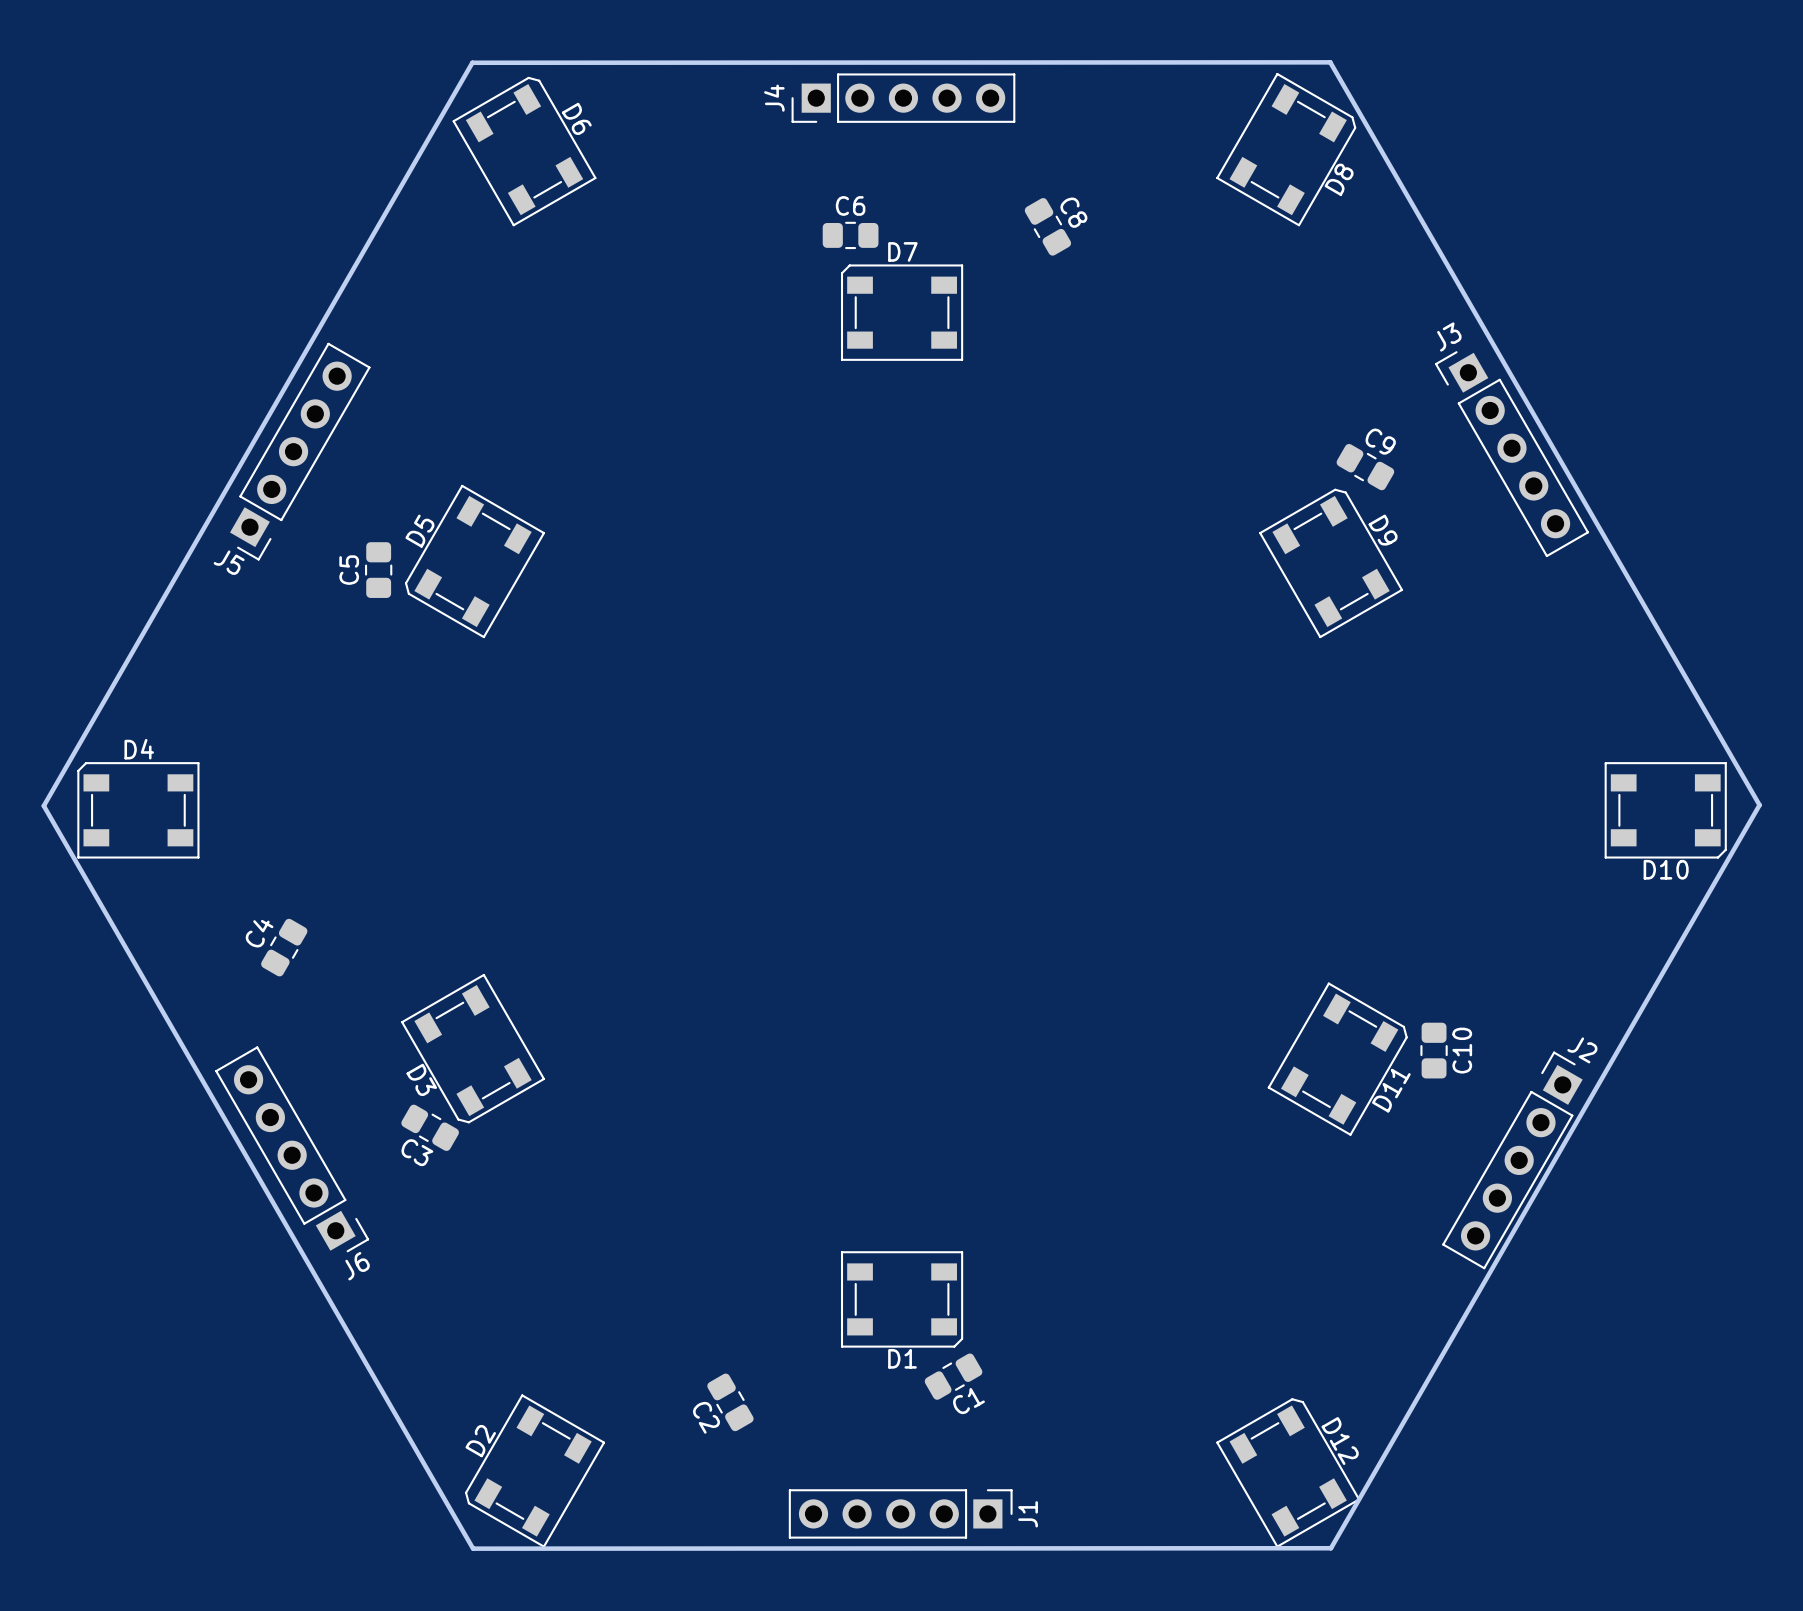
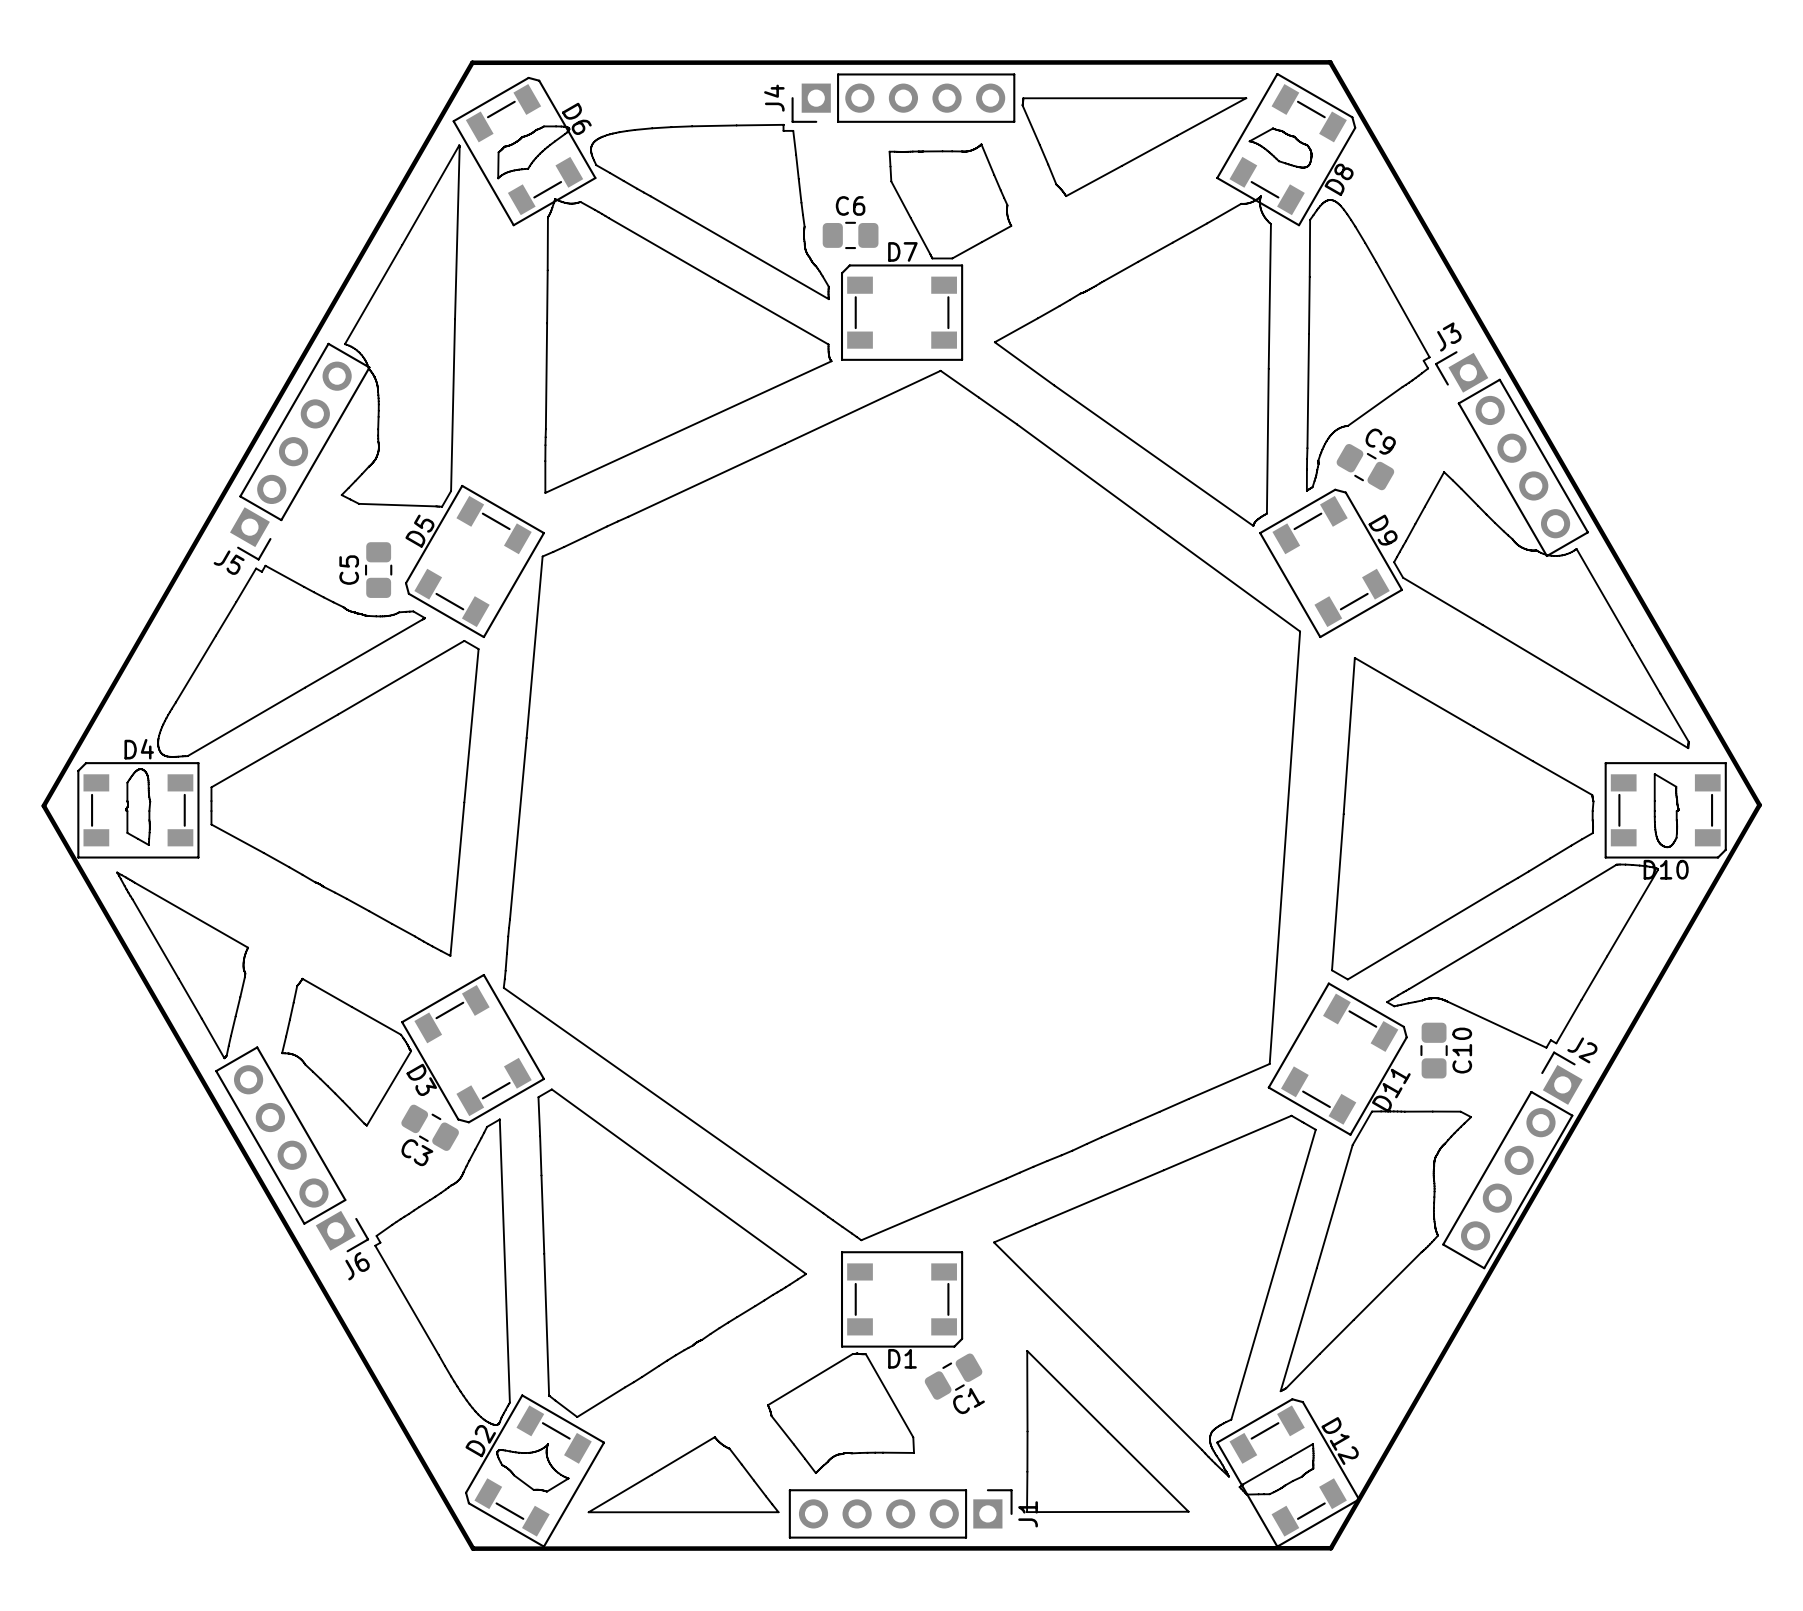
board edge: none -> (1246, 98) (1023, 98) (1022, 105) (1056, 184) (1066, 196) (1246, 98)
board edge: none -> (783, 124) (671, 127) (626, 131) (599, 138) (592, 144) (591, 152) (596, 165) (828, 299) (828, 286) (805, 249) (793, 130) (783, 130) (783, 124)
board edge: none -> (543, 126) (504, 146) (498, 152) (498, 178) (510, 171) (528, 168) (540, 153) (569, 129) (565, 126) (543, 126)
board edge: none -> (981, 144) (1007, 205) (1007, 215) (1011, 225) (952, 258) (932, 258) (891, 181) (889, 151) (965, 151) (981, 144)
board edge: none -> (1305, 144) (1294, 136) (1273, 128) (1249, 141) (1261, 146) (1278, 161) (1302, 167) (1308, 165) (1311, 159) (1310, 151) (1306, 144)
board edge: none -> (459, 145) (344, 344) (360, 353) (374, 376)
board edge: none -> (459, 147) (451, 491) (442, 506) (359, 503) (341, 495) (372, 463) (377, 453) (378, 401) (375, 377)
board edge: none -> (1260, 196) (1251, 202) (1241, 203) (994, 342) (1253, 525) (1256, 520) (1266, 513) (1270, 224) (1261, 211) (1260, 196)
board edge: none -> (555, 199) (568, 203) (580, 201) (828, 344) (831, 361) (545, 492) (547, 217) (555, 199)
C8: (1047, 226) -> none
board edge: none -> (940, 370) (542, 556) (503, 987) (861, 1240) (1269, 1063) (1300, 631) (940, 370)
board edge: none -> (1347, 425) (1336, 430) (1326, 441) (1318, 460) (1312, 487) (1306, 490) (1310, 219) (1321, 204) (1329, 200) (1339, 204) (1351, 219) (1429, 357) (1423, 360) (1428, 368) (1347, 425)
board edge: none -> (1444, 472) (1394, 562) (1403, 577) (1688, 748) (1688, 741) (1576, 548) (1567, 554) (1554, 555) (1521, 547) (1444, 472)
board edge: none -> (423, 619) (425, 618) (413, 611) (382, 616) (356, 613) (265, 565) (261, 571) (256, 568) (166, 718) (159, 735) (159, 750) (167, 756) (187, 756) (422, 619)
board edge: none -> (464, 640) (211, 787) (211, 824) (450, 955) (478, 649) (464, 640)
board edge: none -> (1354, 657) (1332, 970) (1347, 979) (1592, 833) (1593, 828) (1592, 795) (1354, 657)
board edge: none -> (127, 802) (127, 782) (136, 771) (142, 769) (147, 776) (150, 801) (148, 845) (127, 832) (126, 811)
board edge: none -> (126, 808) (126, 809)
board edge: none -> (1678, 809) (1676, 786) (1654, 774) (1655, 832) (1658, 841) (1664, 846) (1670, 846) (1676, 837) (1676, 811) (1678, 809)
board edge: none -> (1658, 869) (1639, 865) (1616, 864) (1387, 1002) (1394, 1006) (1431, 998)
board edge: none -> (1658, 869) (1556, 1043) (1550, 1040) (1546, 1047) (1445, 1000) (1432, 998)
C4: (284, 947) -> none
board edge: none -> (409, 1049) (401, 1034) (302, 978) (297, 985) (282, 1053) (292, 1054) (300, 1058) (366, 1125) (410, 1050)
board edge: none -> (225, 1056) (244, 977) (243, 961) (248, 947) (117, 872) (224, 1057)
board edge: none -> (1372, 1111) (1352, 1145) (1280, 1391) (1286, 1388) (1438, 1235) (1434, 1216) (1434, 1159) (1442, 1146) (1471, 1117) (1460, 1111) (1372, 1111)
board edge: none -> (1291, 1115) (994, 1242) (1228, 1476) (1211, 1447) (1210, 1435) (1216, 1427) (1231, 1419) (1315, 1129) (1291, 1115)
board edge: none -> (499, 1119) (509, 1402) (499, 1423) (495, 1425) (481, 1417) (460, 1391) (375, 1245) (380, 1242) (376, 1235) (458, 1180) (487, 1126) (499, 1119)
board edge: none -> (1027, 1350) (1027, 1512) (1188, 1511) (1107, 1431) (1027, 1350)
board edge: none -> (856, 1353) (852, 1354) (767, 1405) (771, 1415) (815, 1473) (832, 1457) (845, 1453) (914, 1452) (913, 1437) (865, 1354) (856, 1353)
board edge: none -> (549, 1395) (577, 1417) (806, 1274) (551, 1089) (538, 1097) (549, 1395)
C2: (730, 1402) -> none
board edge: none -> (548, 1444) (532, 1452) (500, 1450) (497, 1451) (497, 1454) (502, 1465) (514, 1475) (533, 1489) (546, 1491) (568, 1478) (558, 1473) (550, 1463) (546, 1453) (548, 1444)
board edge: none -> (728, 1448) (714, 1437) (588, 1512) (778, 1512) (729, 1448)
board edge: none -> (1242, 1484) (1313, 1444) (1313, 1468) (1269, 1494) (1247, 1494)
board edge: none -> (1239, 1487) (1247, 1494)

